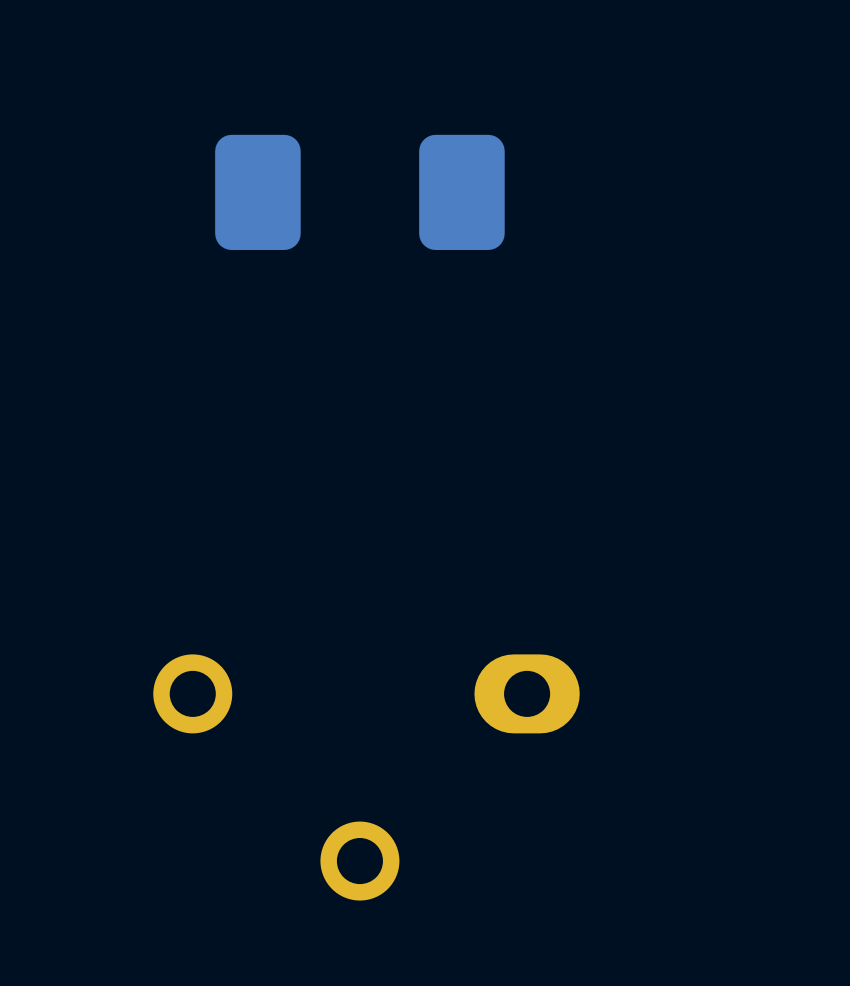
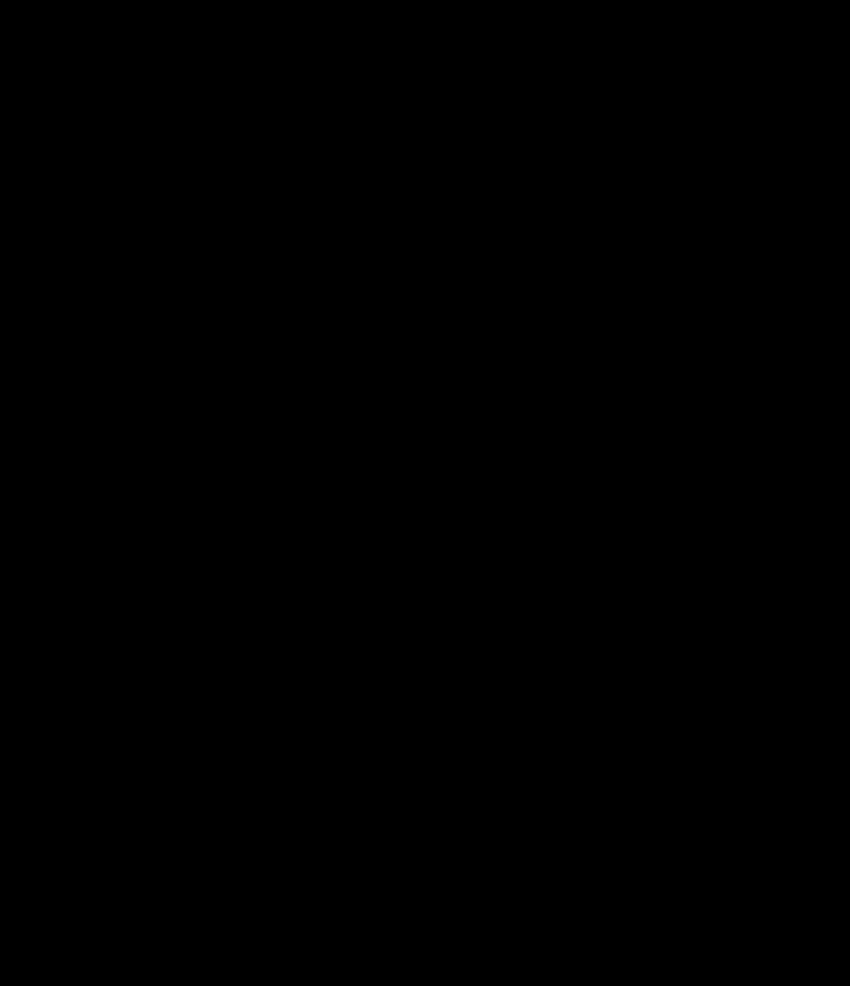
part: (359, 192) -> none
part: (366, 777) -> none

